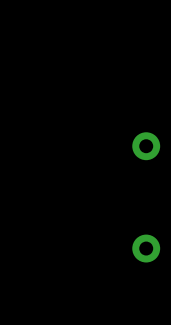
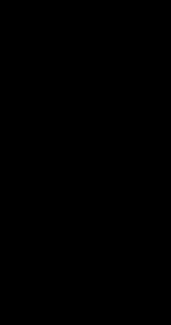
via: (146, 146) -> none
via: (146, 248) -> none

